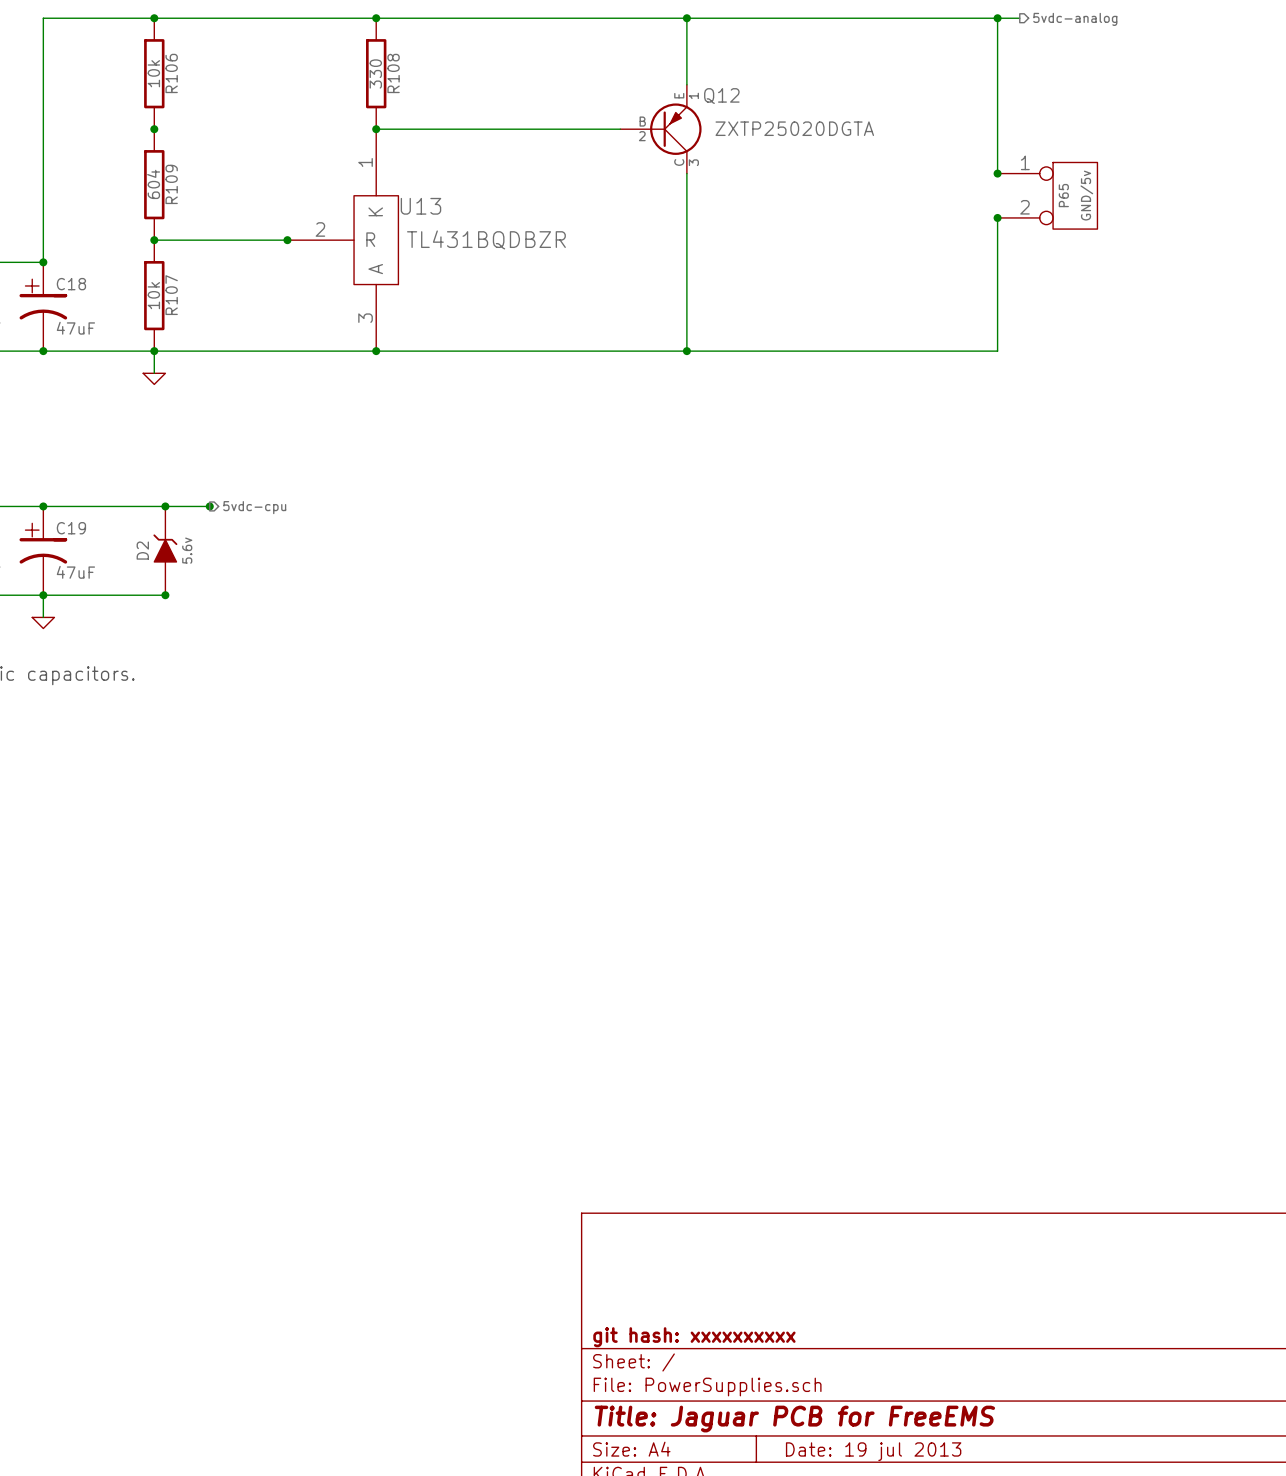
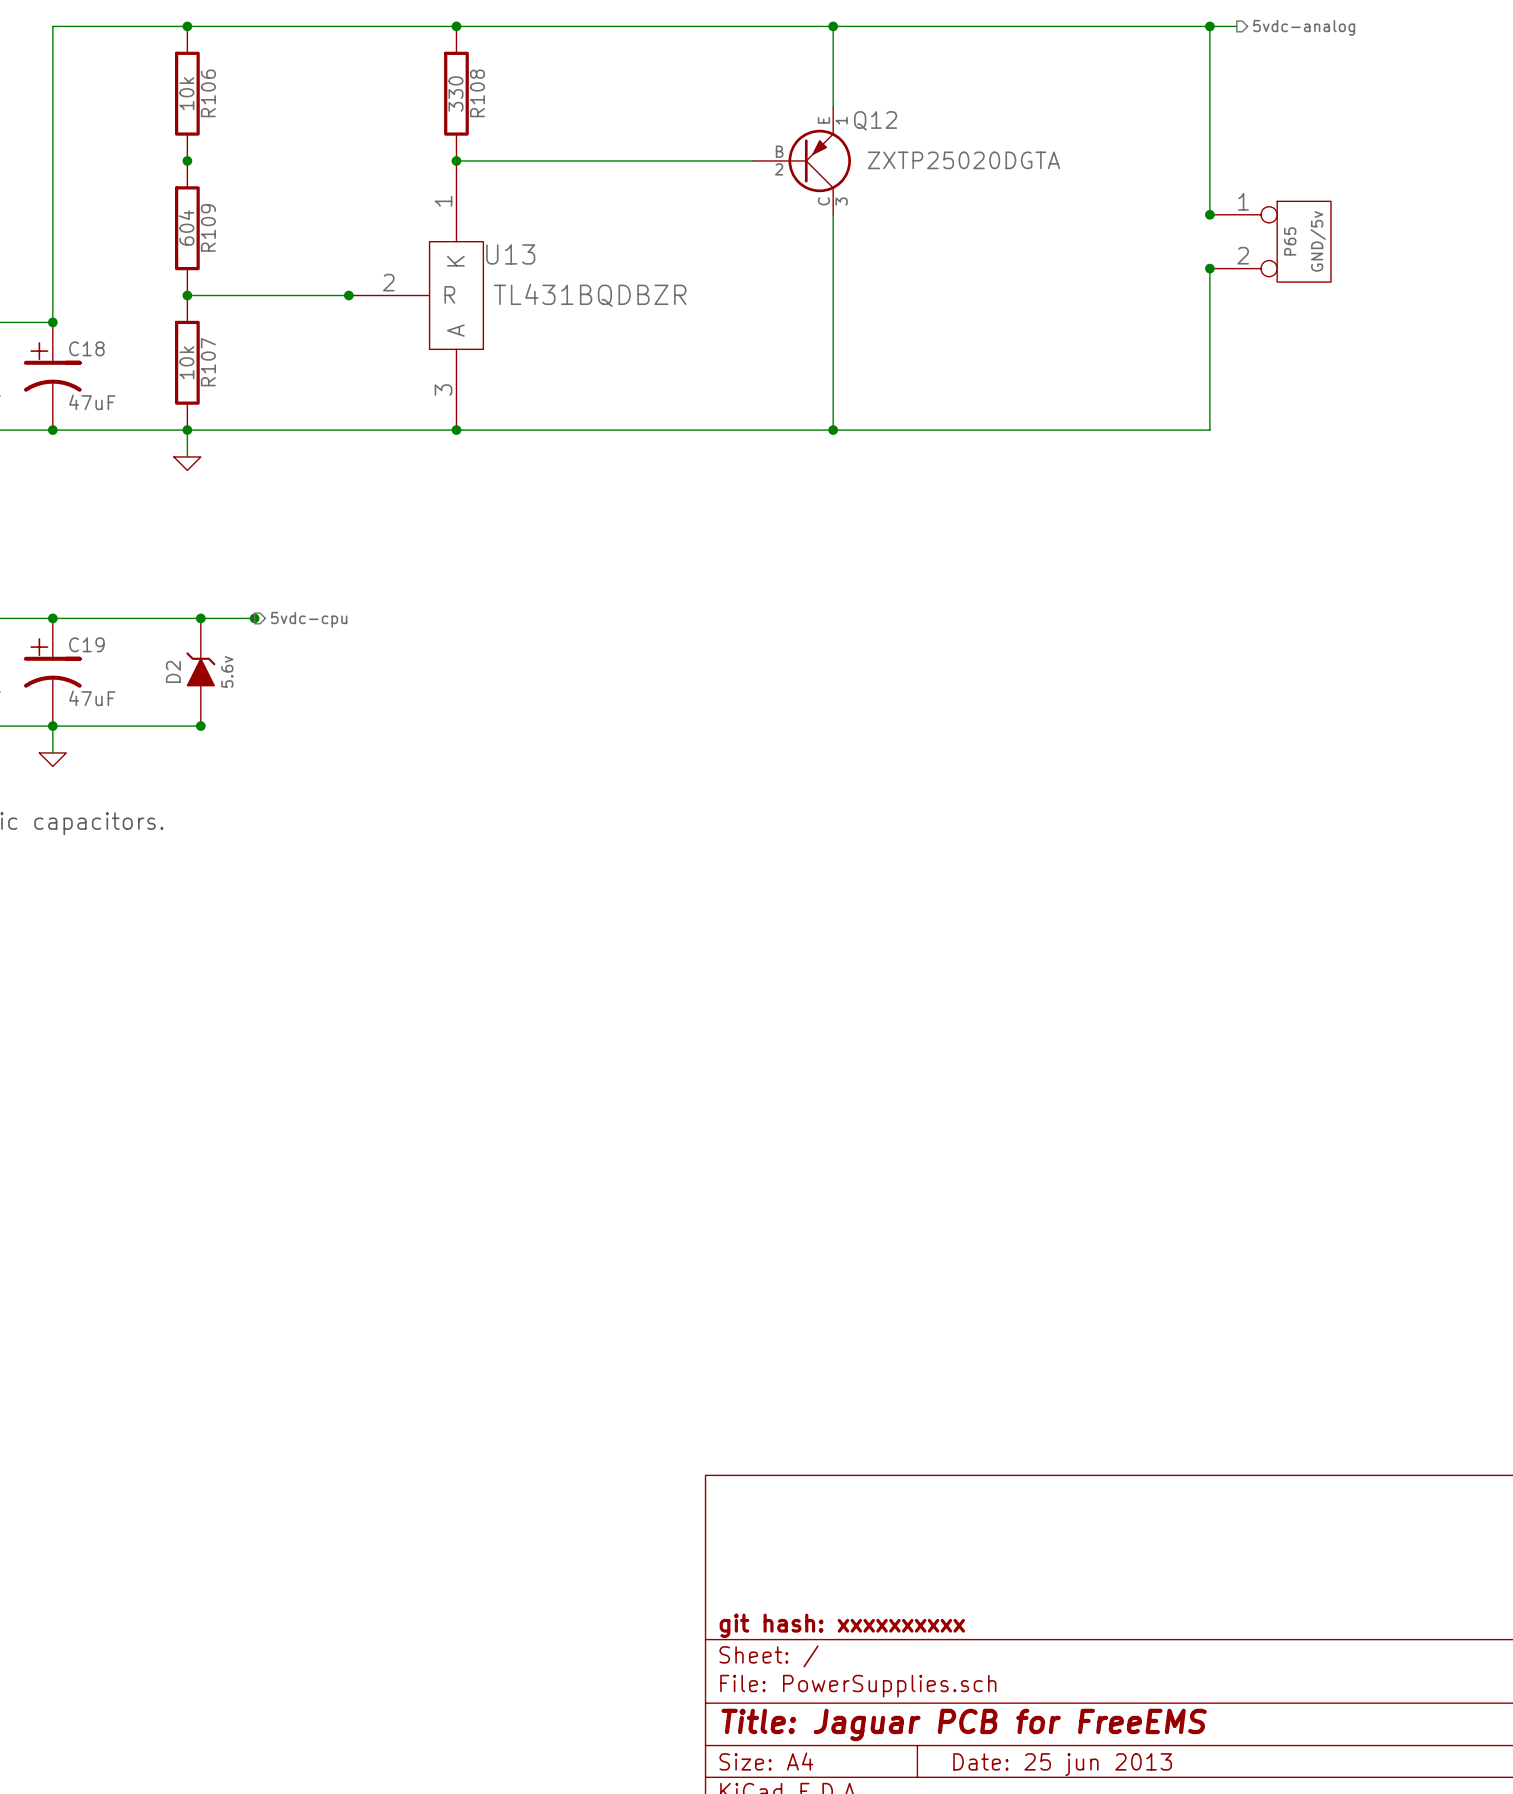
title block: Date: 19 jul 2013 (873, 1451) -> Date: 25 jun 2013 (1062, 1764)

